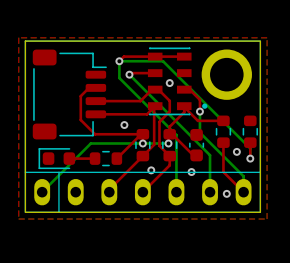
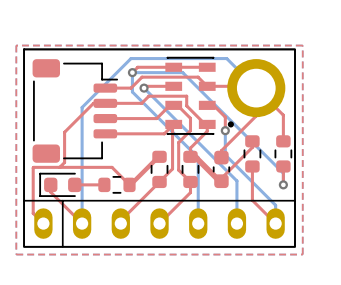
top track: none -> (105, 88) (131, 88) (142, 77) (198, 77) (207, 86) (254, 86) (283, 115) (283, 141)
top track: none -> (256, 88) (256, 115) (221, 150) (221, 157)
via: (169, 83) -> none
top track: (89, 87) (80, 96) (80, 120) (95, 134) (142, 134) (142, 143) -> (97, 103) (93, 103) (64, 132) (64, 162) (59, 167)
top track: none -> (105, 103) (141, 103) (148, 96) (186, 96) (186, 105) (207, 124)
bottom track: none -> (256, 107) (256, 88) (226, 58) (131, 58) (82, 107) (82, 223)
top track: (184, 107) (197, 120) (223, 120) -> (193, 156) (197, 156) (221, 181) (221, 178) (252, 147) (252, 141)
via: (124, 125) -> none
top track: none -> (159, 156) (131, 184) (112, 167) (33, 167) (33, 213) (43, 223)
via: (142, 143) -> none
bottom track: (168, 143) (90, 143) (42, 192) -> none
via: (168, 143) -> none
via: (236, 151) -> none
top track: none -> (50, 184) (50, 192) (82, 223)
via: (151, 170) -> none
via: (191, 172) -> none
via: (226, 193) -> none

